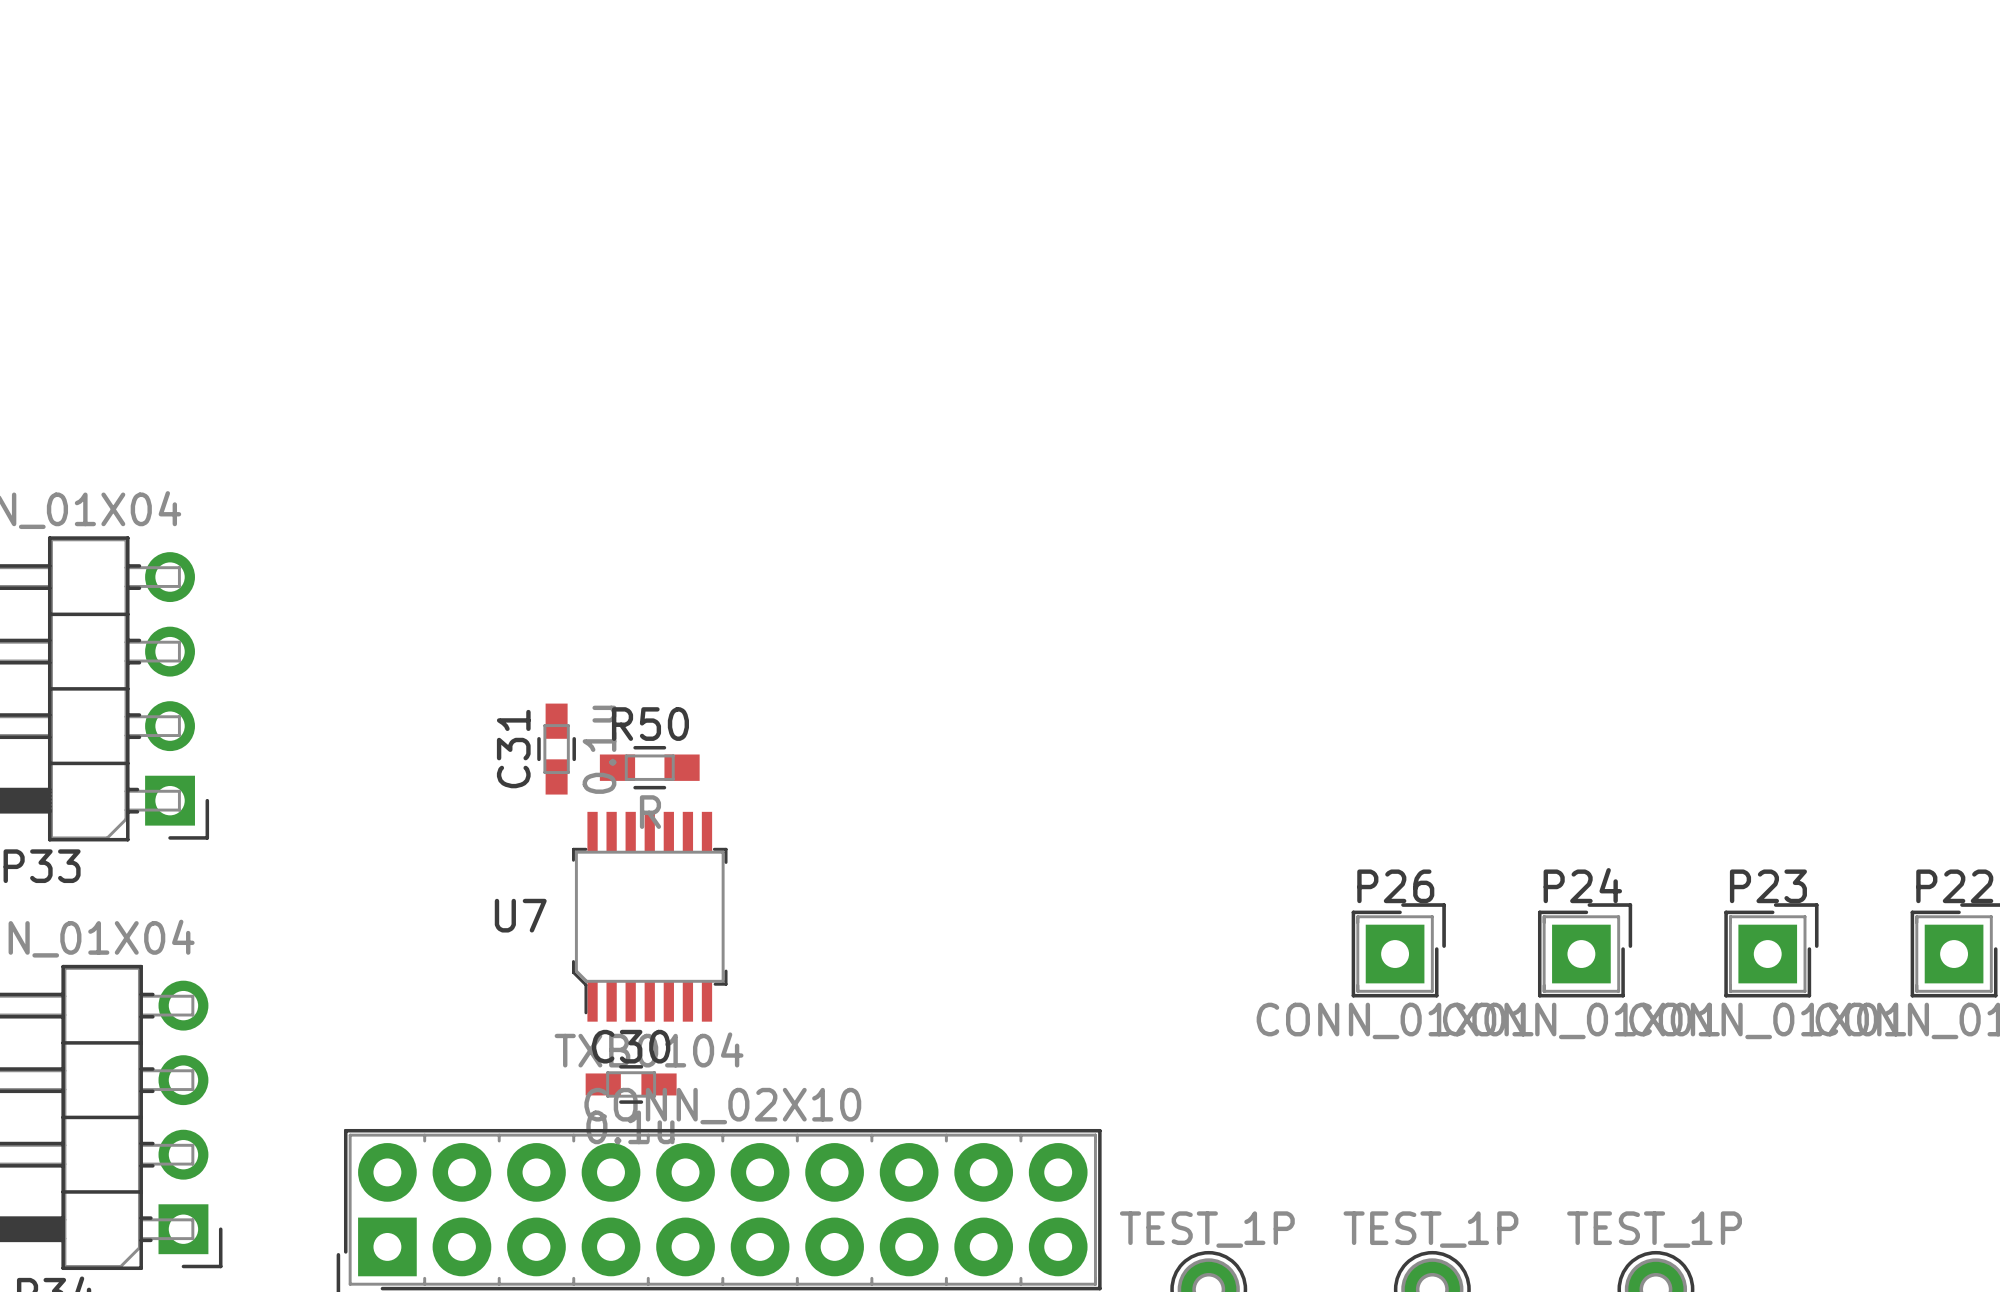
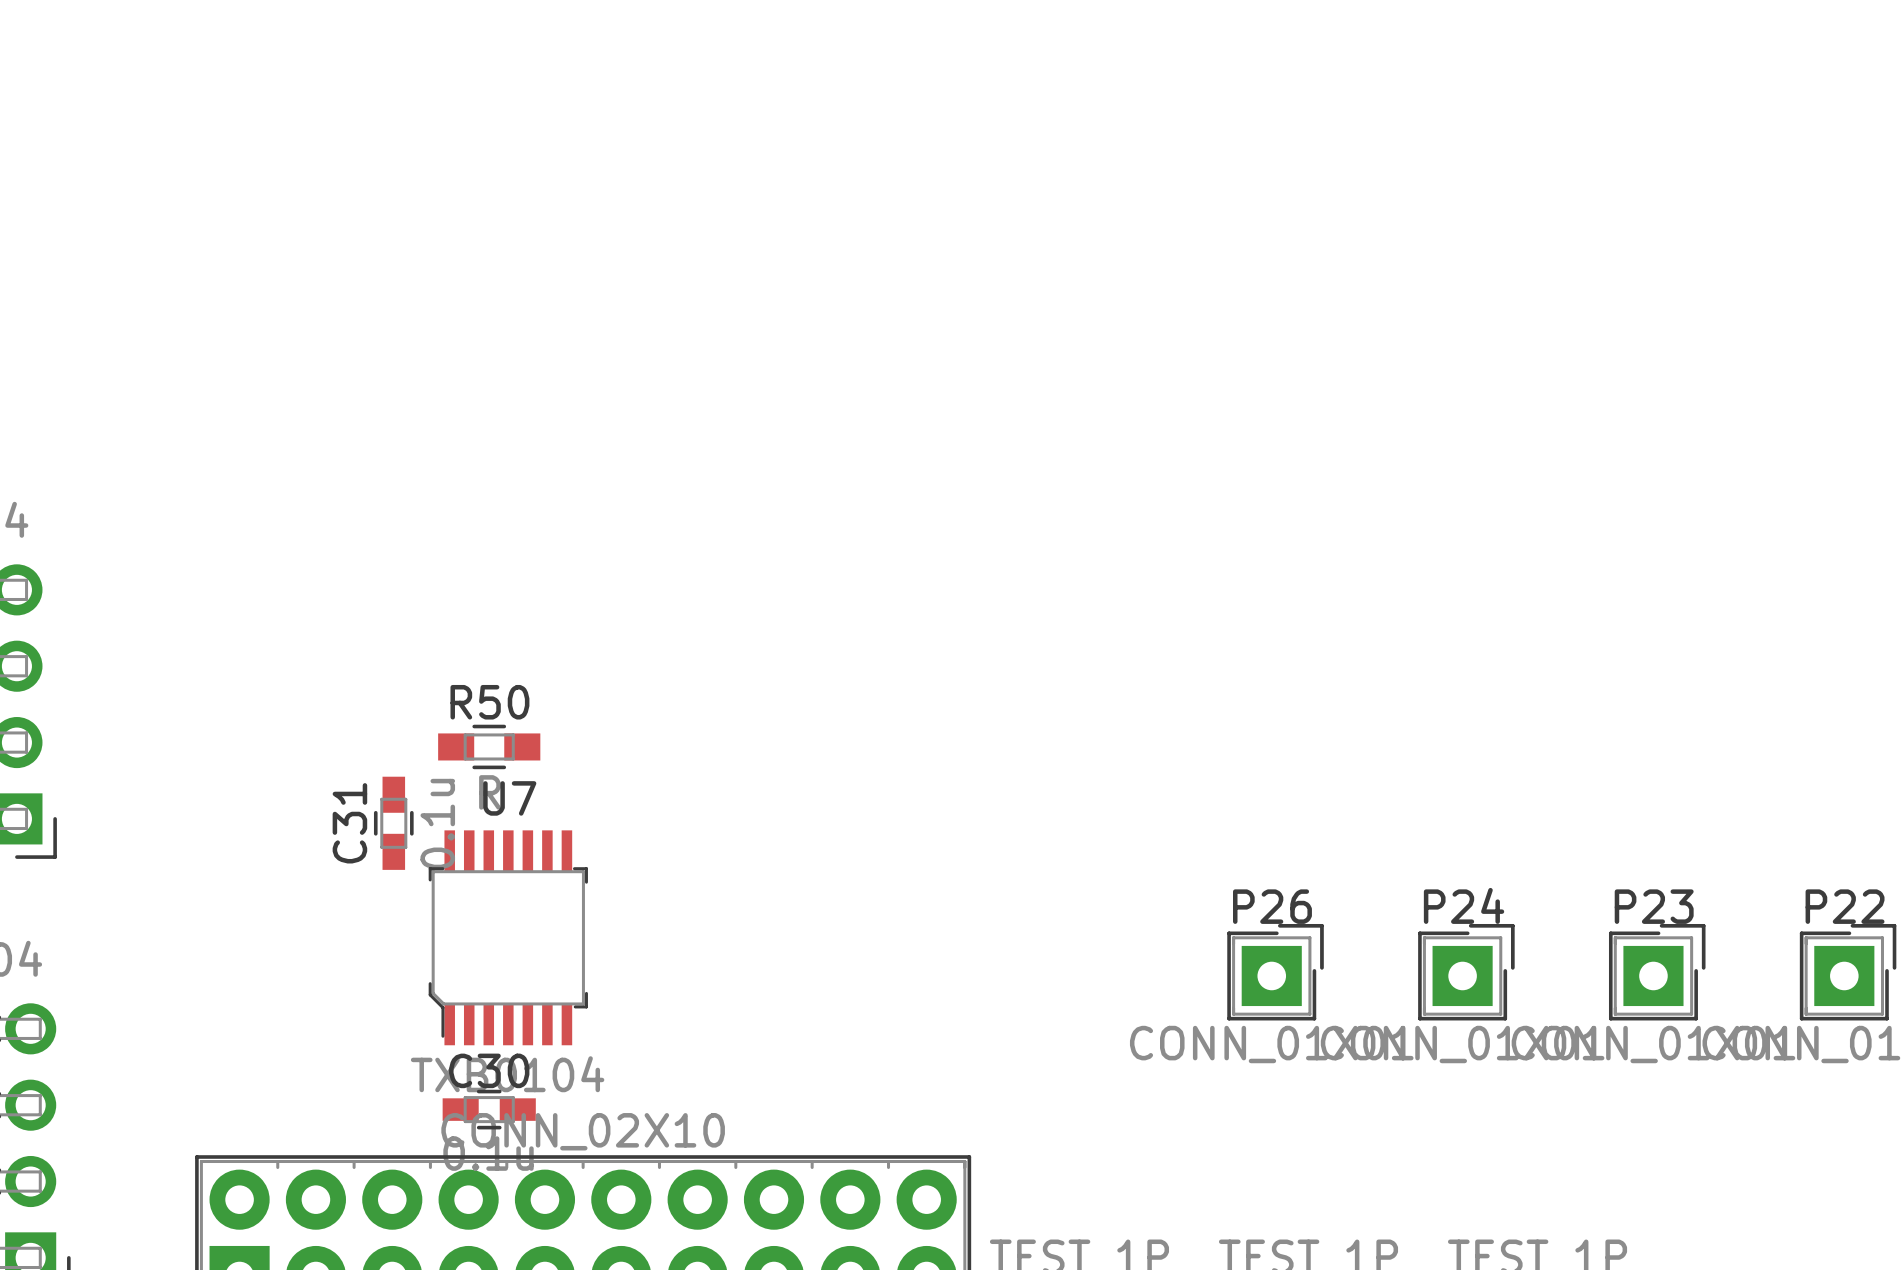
C31 position: (556, 749) -> (393, 823)
R50 position: (649, 767) -> (489, 746)
U7 name position: U7 (520, 915) -> U7 (509, 798)

